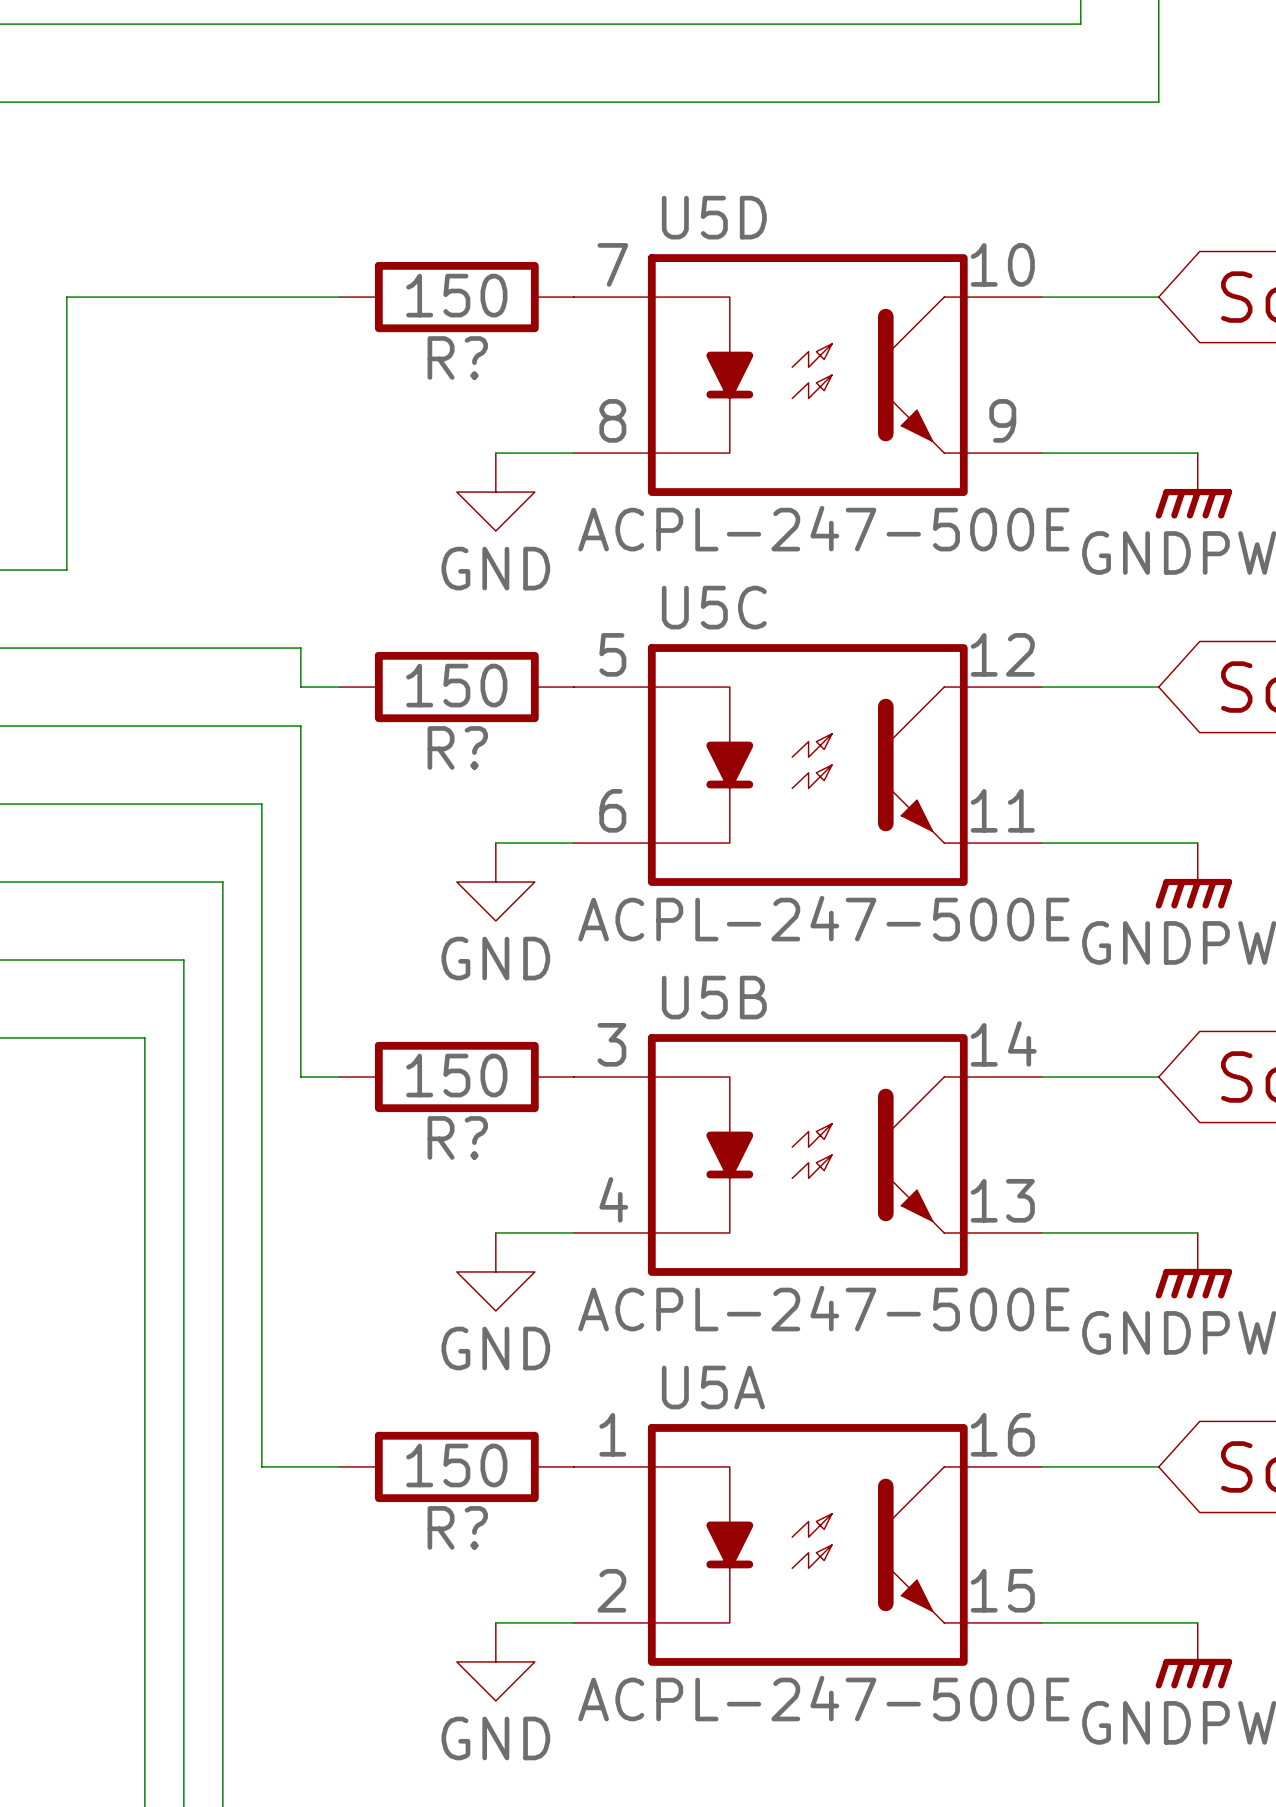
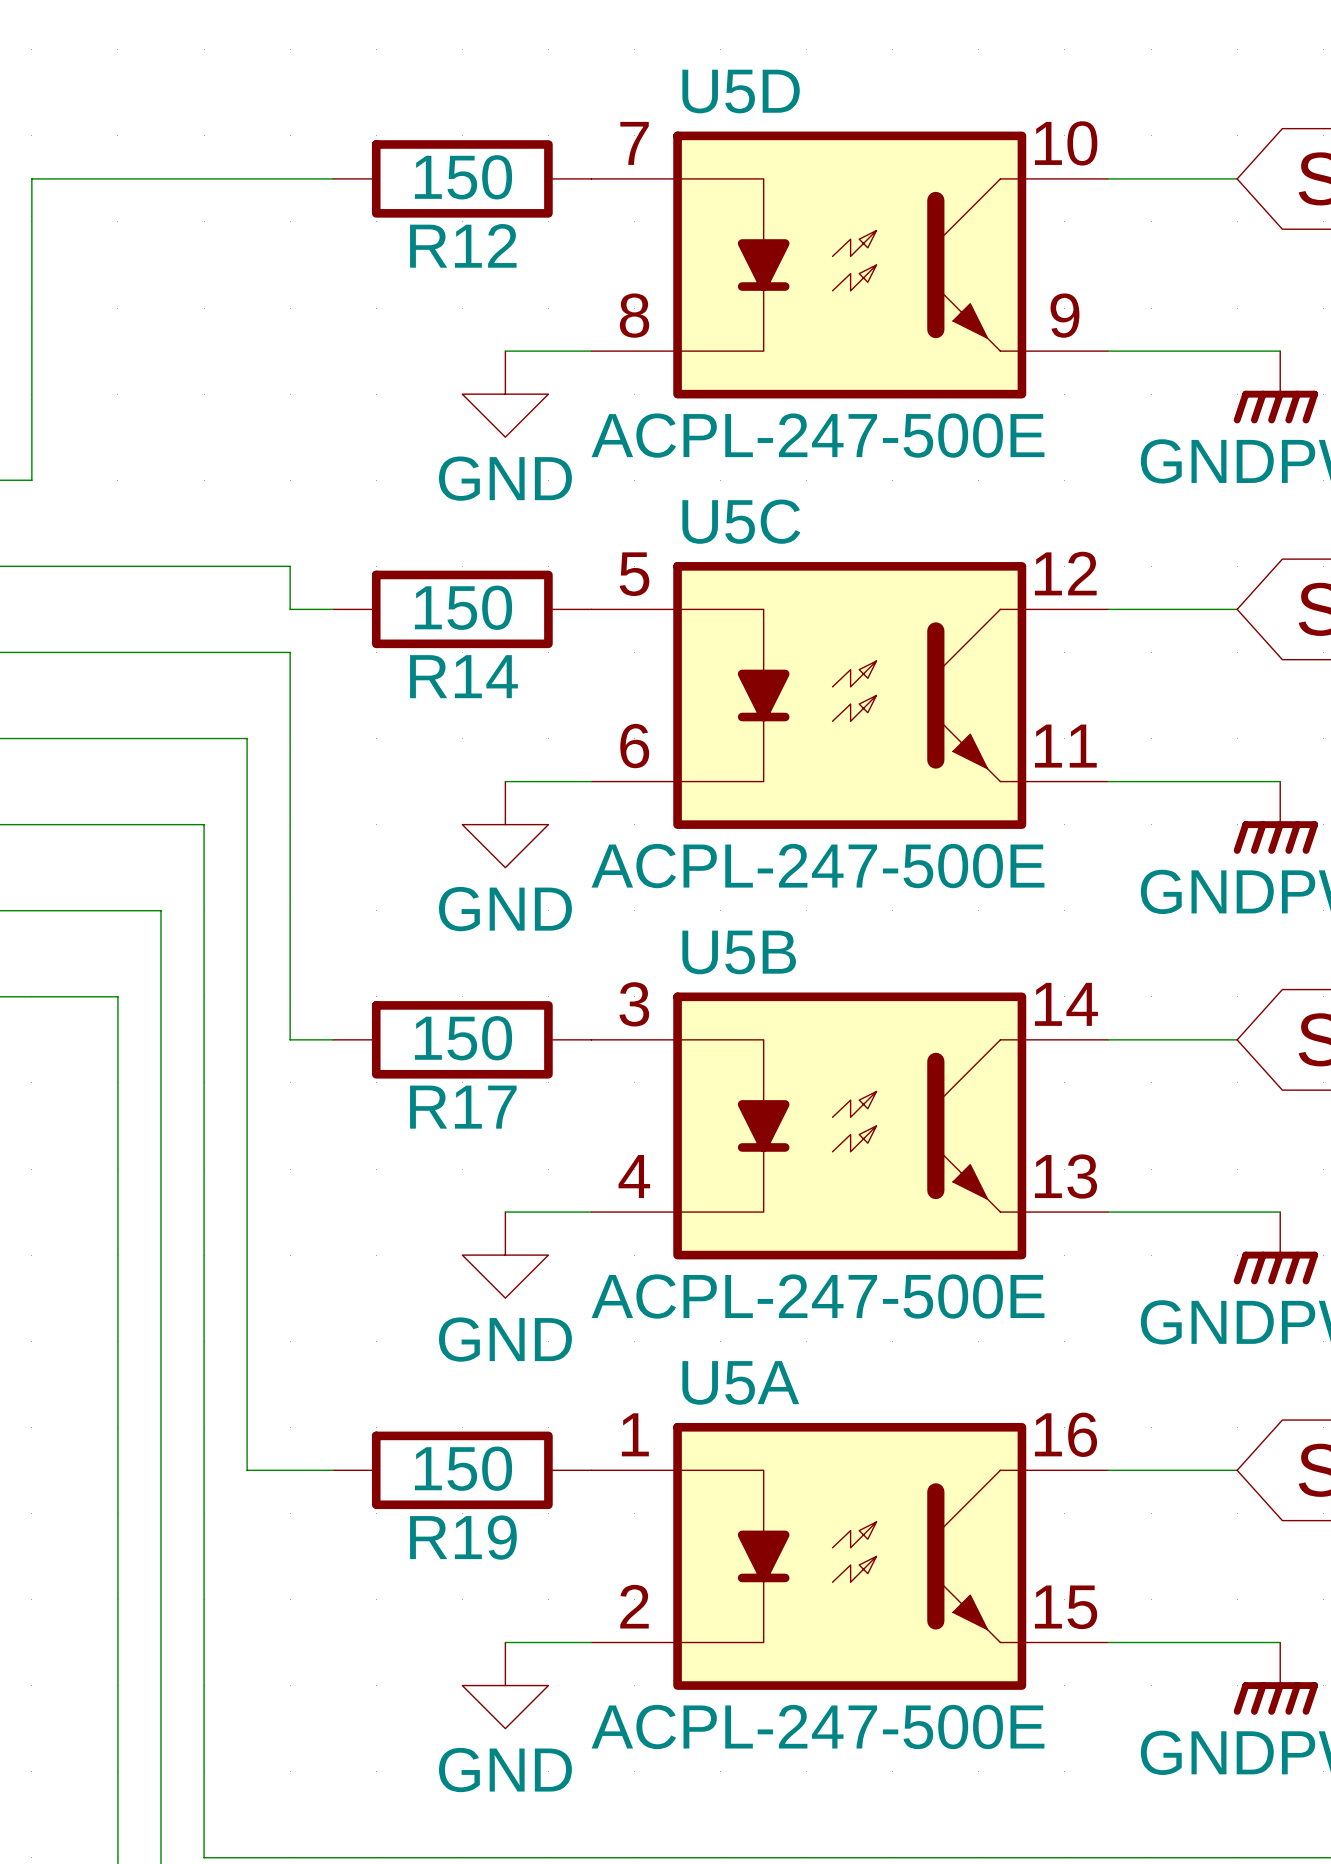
R? name: R? (457, 358) -> R12 (463, 245)
R? name: R? (457, 747) -> R14 (463, 676)
R? name: R? (457, 1137) -> R17 (463, 1107)
R? name: R? (457, 1527) -> R19 (463, 1537)

